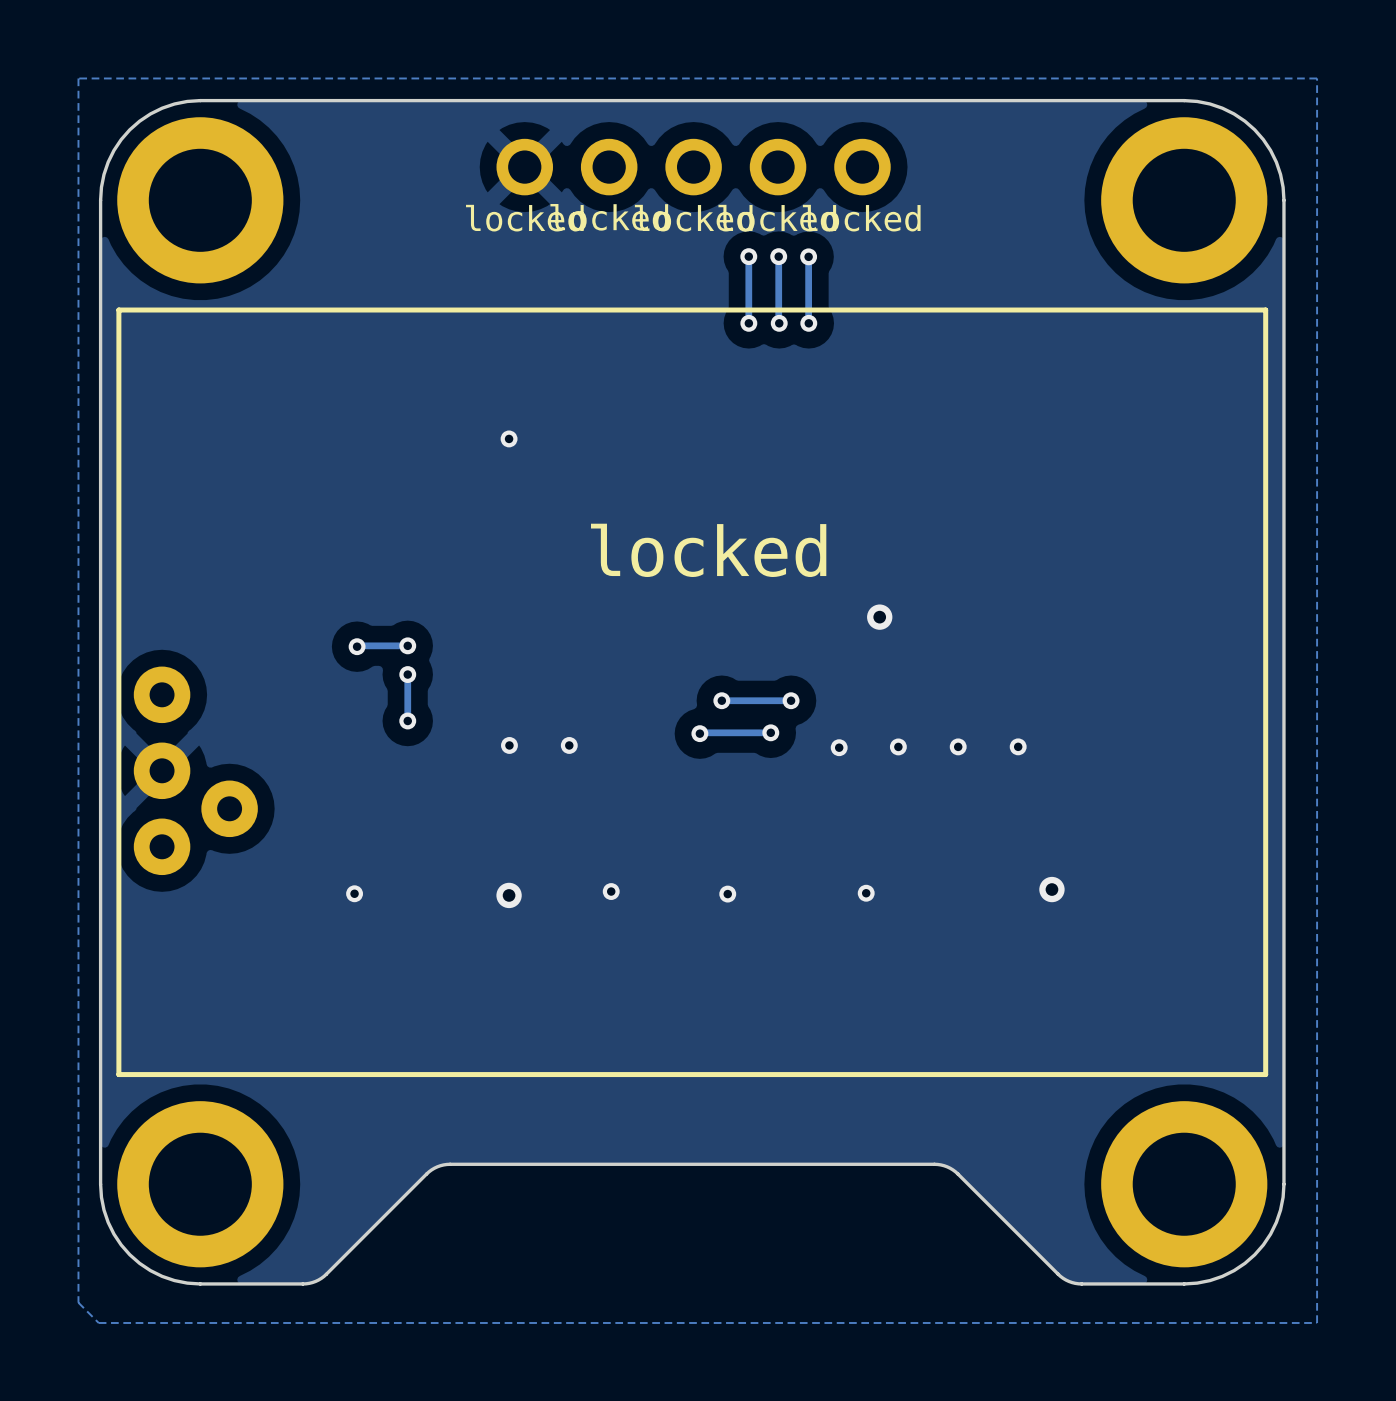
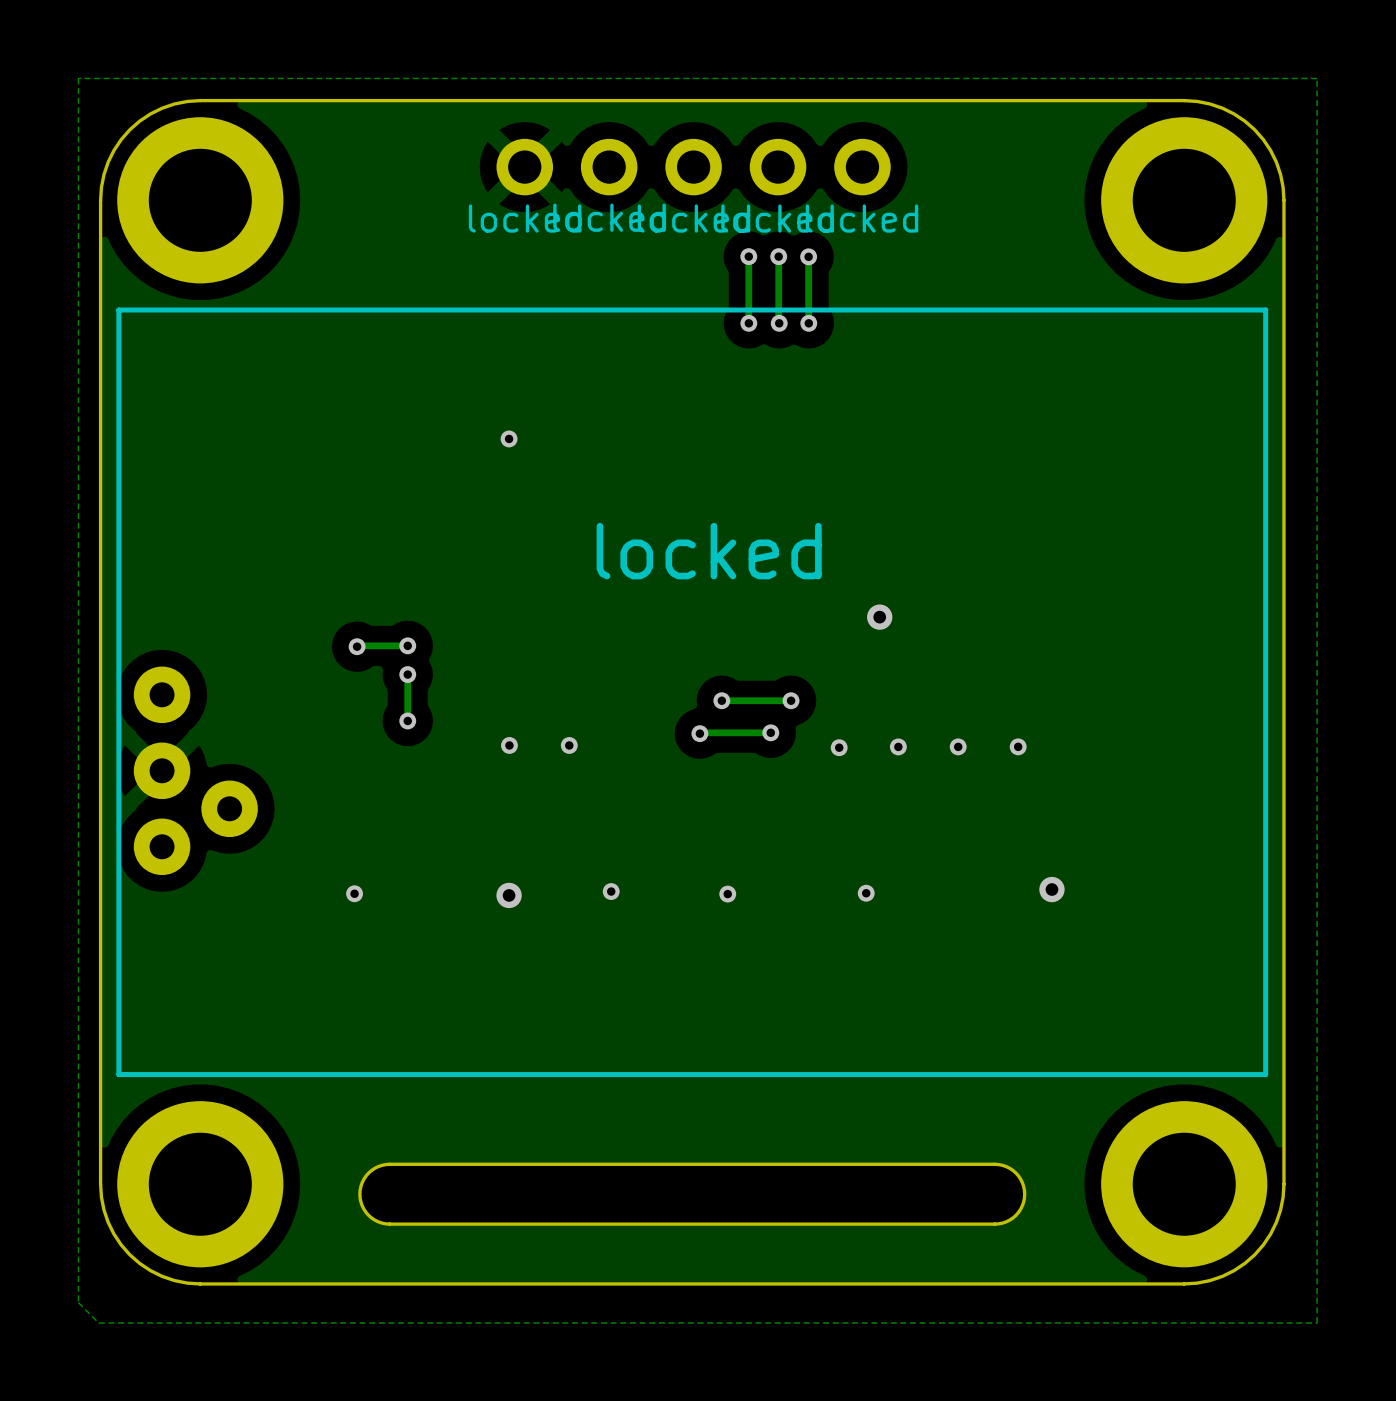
board edge: (450, 1164) (437, 1166) (429, 1171) (323, 1276) (312, 1282) (302, 1283) -> (1081, 1283) (302, 1283)
board edge: (934, 1164) (947, 1166) (955, 1171) (1060, 1276) (1068, 1281) (1081, 1283) -> (934, 1164) (994, 1164) (1009, 1168) (1018, 1176) (1023, 1186) (1024, 1198) (1020, 1209) (1009, 1220) (994, 1224) (389, 1224) (374, 1220) (363, 1209) (360, 1198) (360, 1186) (366, 1176) (374, 1168) (389, 1164) (450, 1164)

